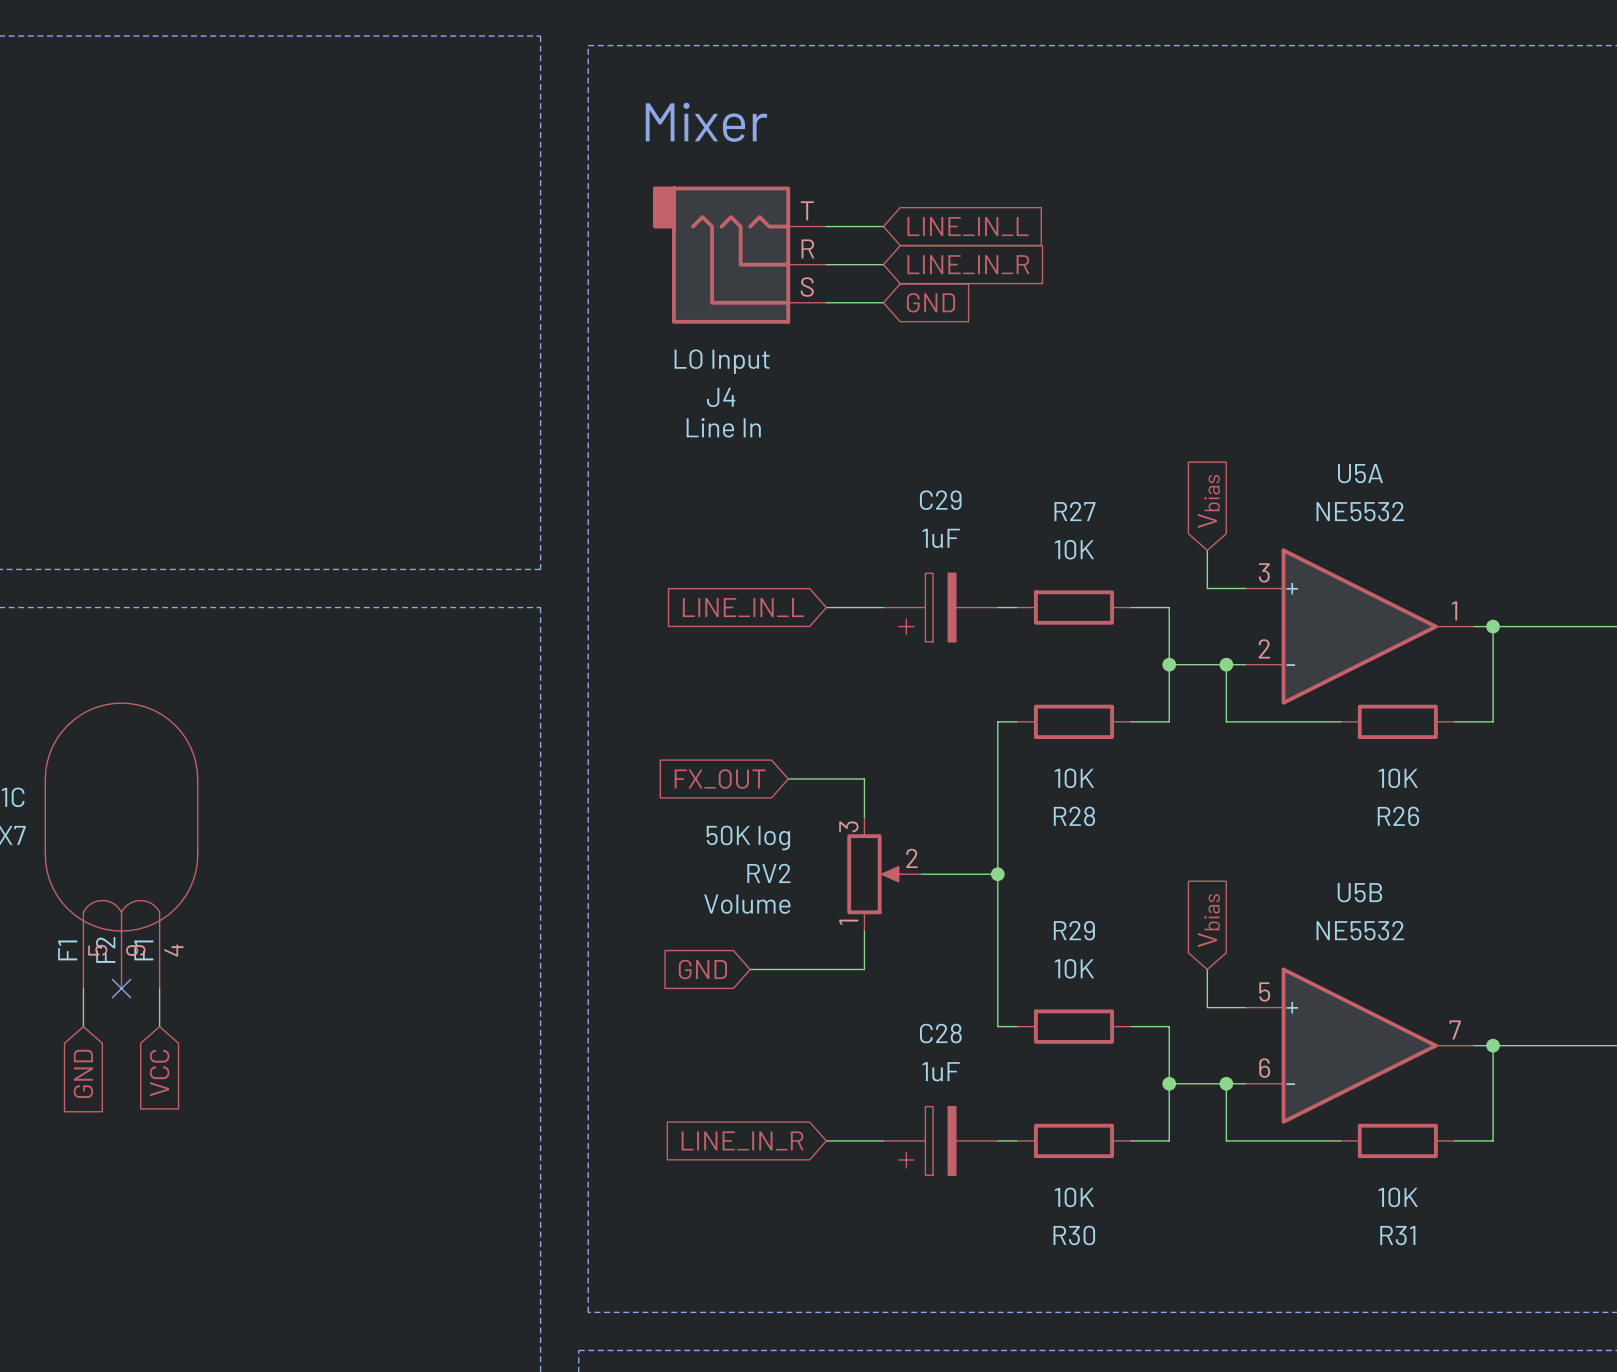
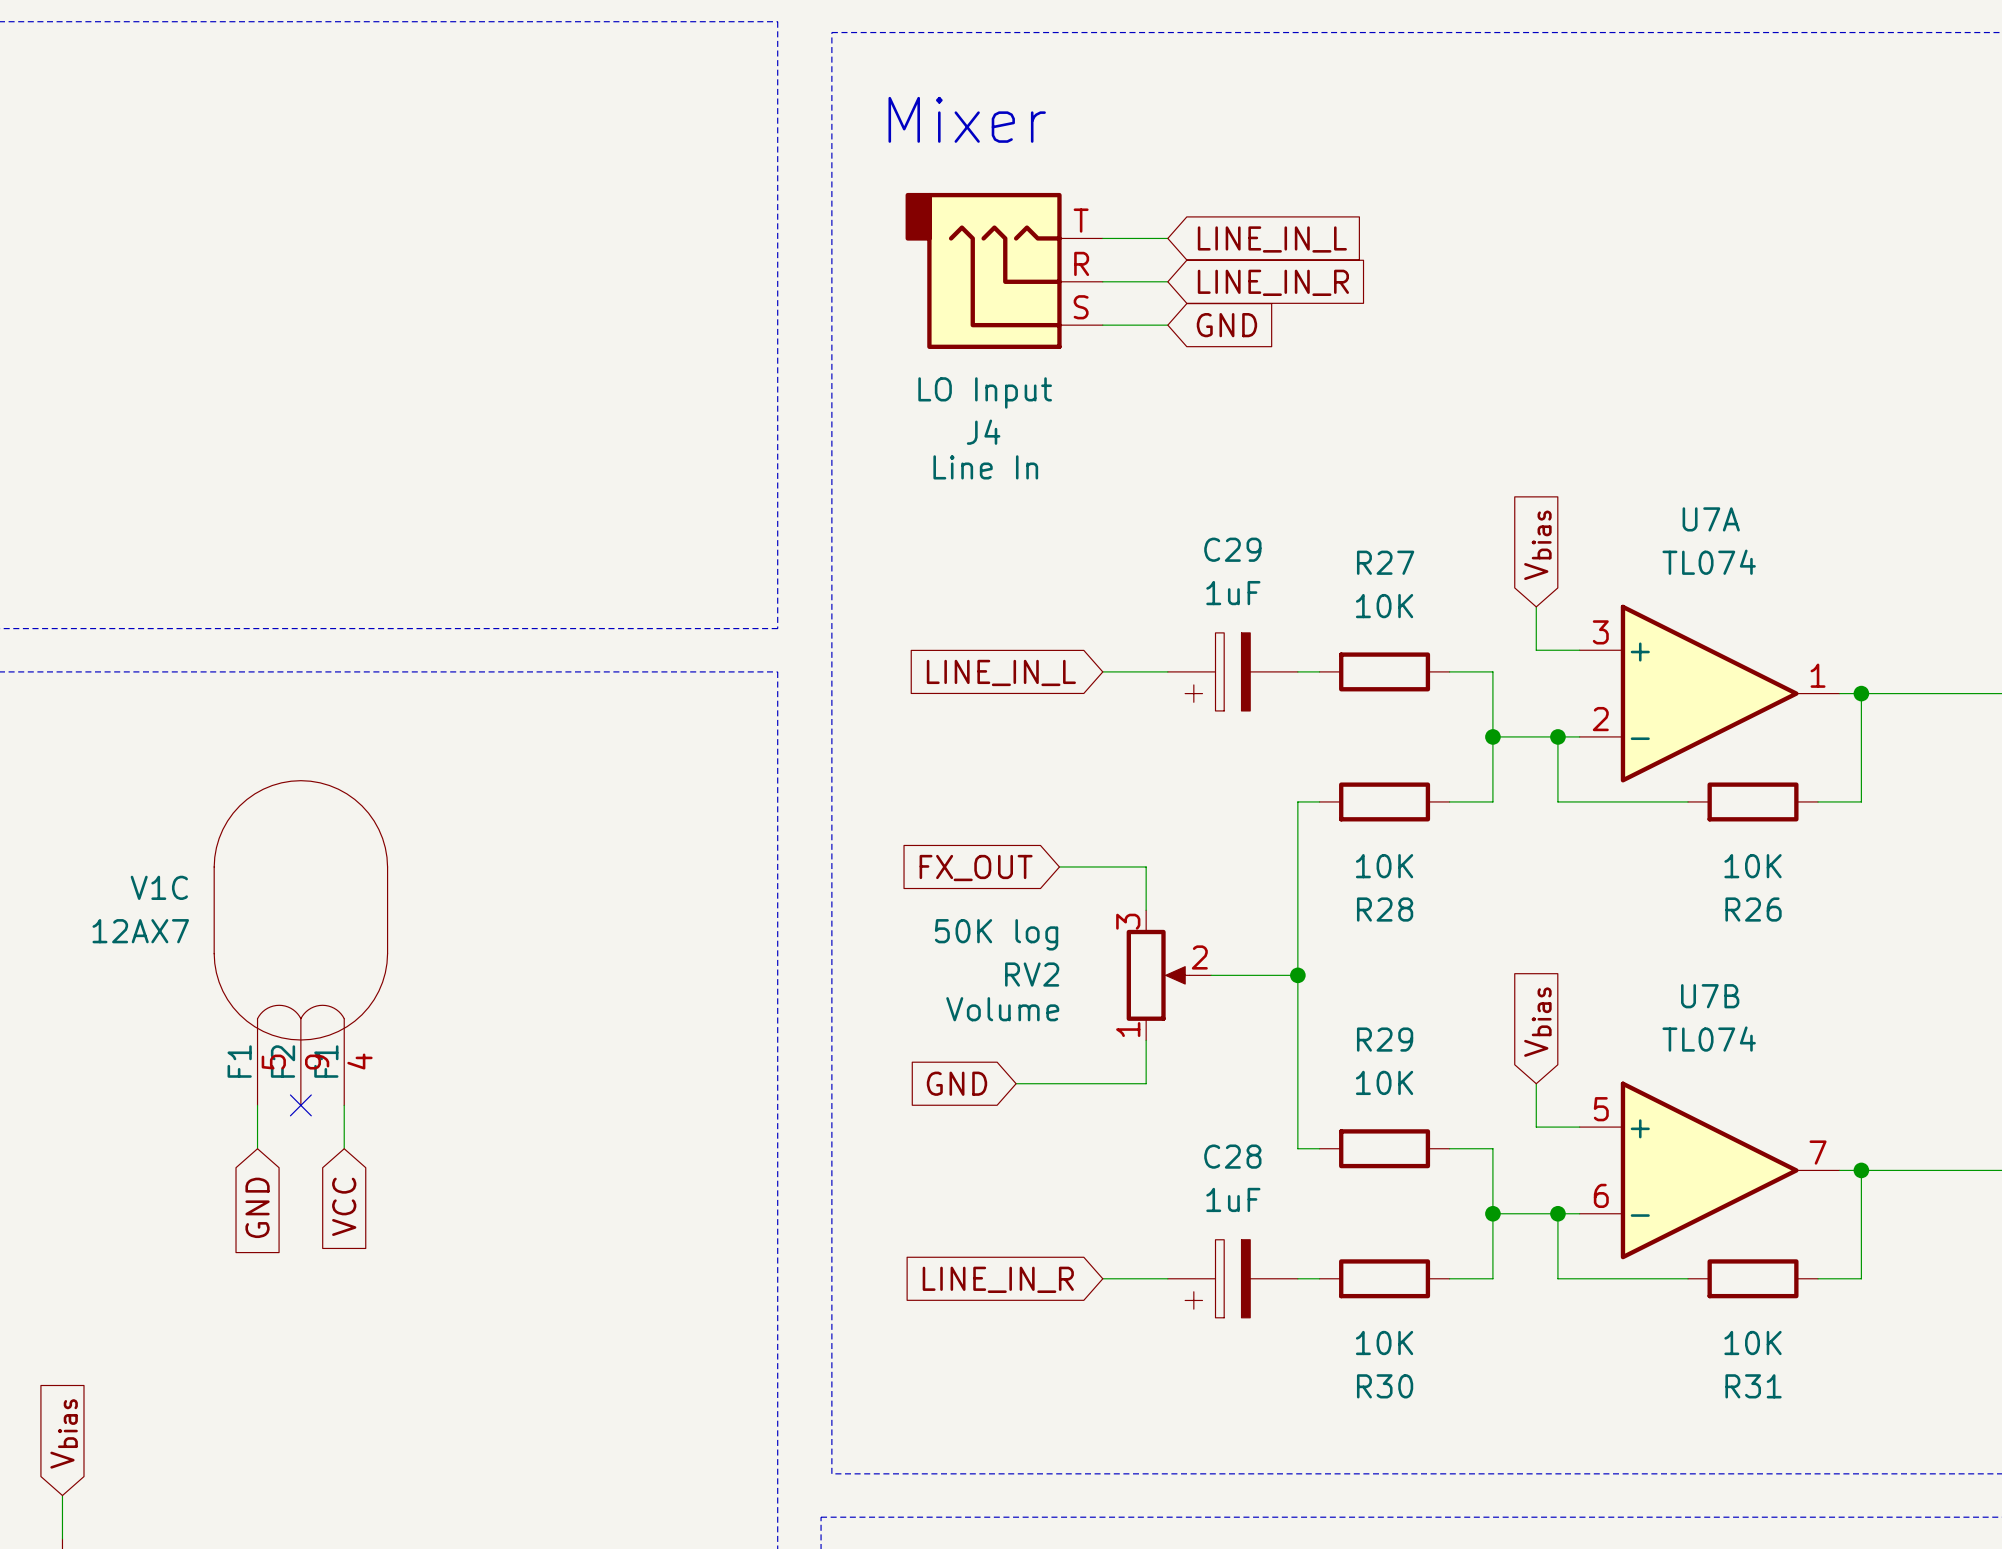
U5A name: U5A (1360, 473) -> U7A (1711, 519)
U5A value: NE5532 (1360, 511) -> TL074 (1709, 562)
U5B name: U5B (1359, 892) -> U7B (1710, 996)
U5B value: NE5532 (1360, 930) -> TL074 (1709, 1039)

